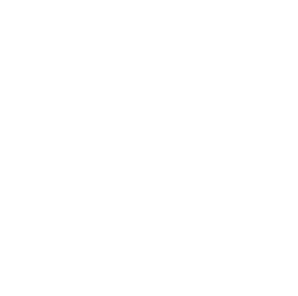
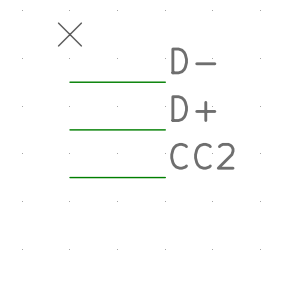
no-connect mark: none -> (69, 34)
label: none -> D- (193, 60)
wire: none -> (69, 82) (165, 82)
label: none -> D+ (193, 108)
wire: none -> (69, 129) (165, 129)
label: none -> CC2 (202, 156)
wire: none -> (69, 177) (165, 177)

